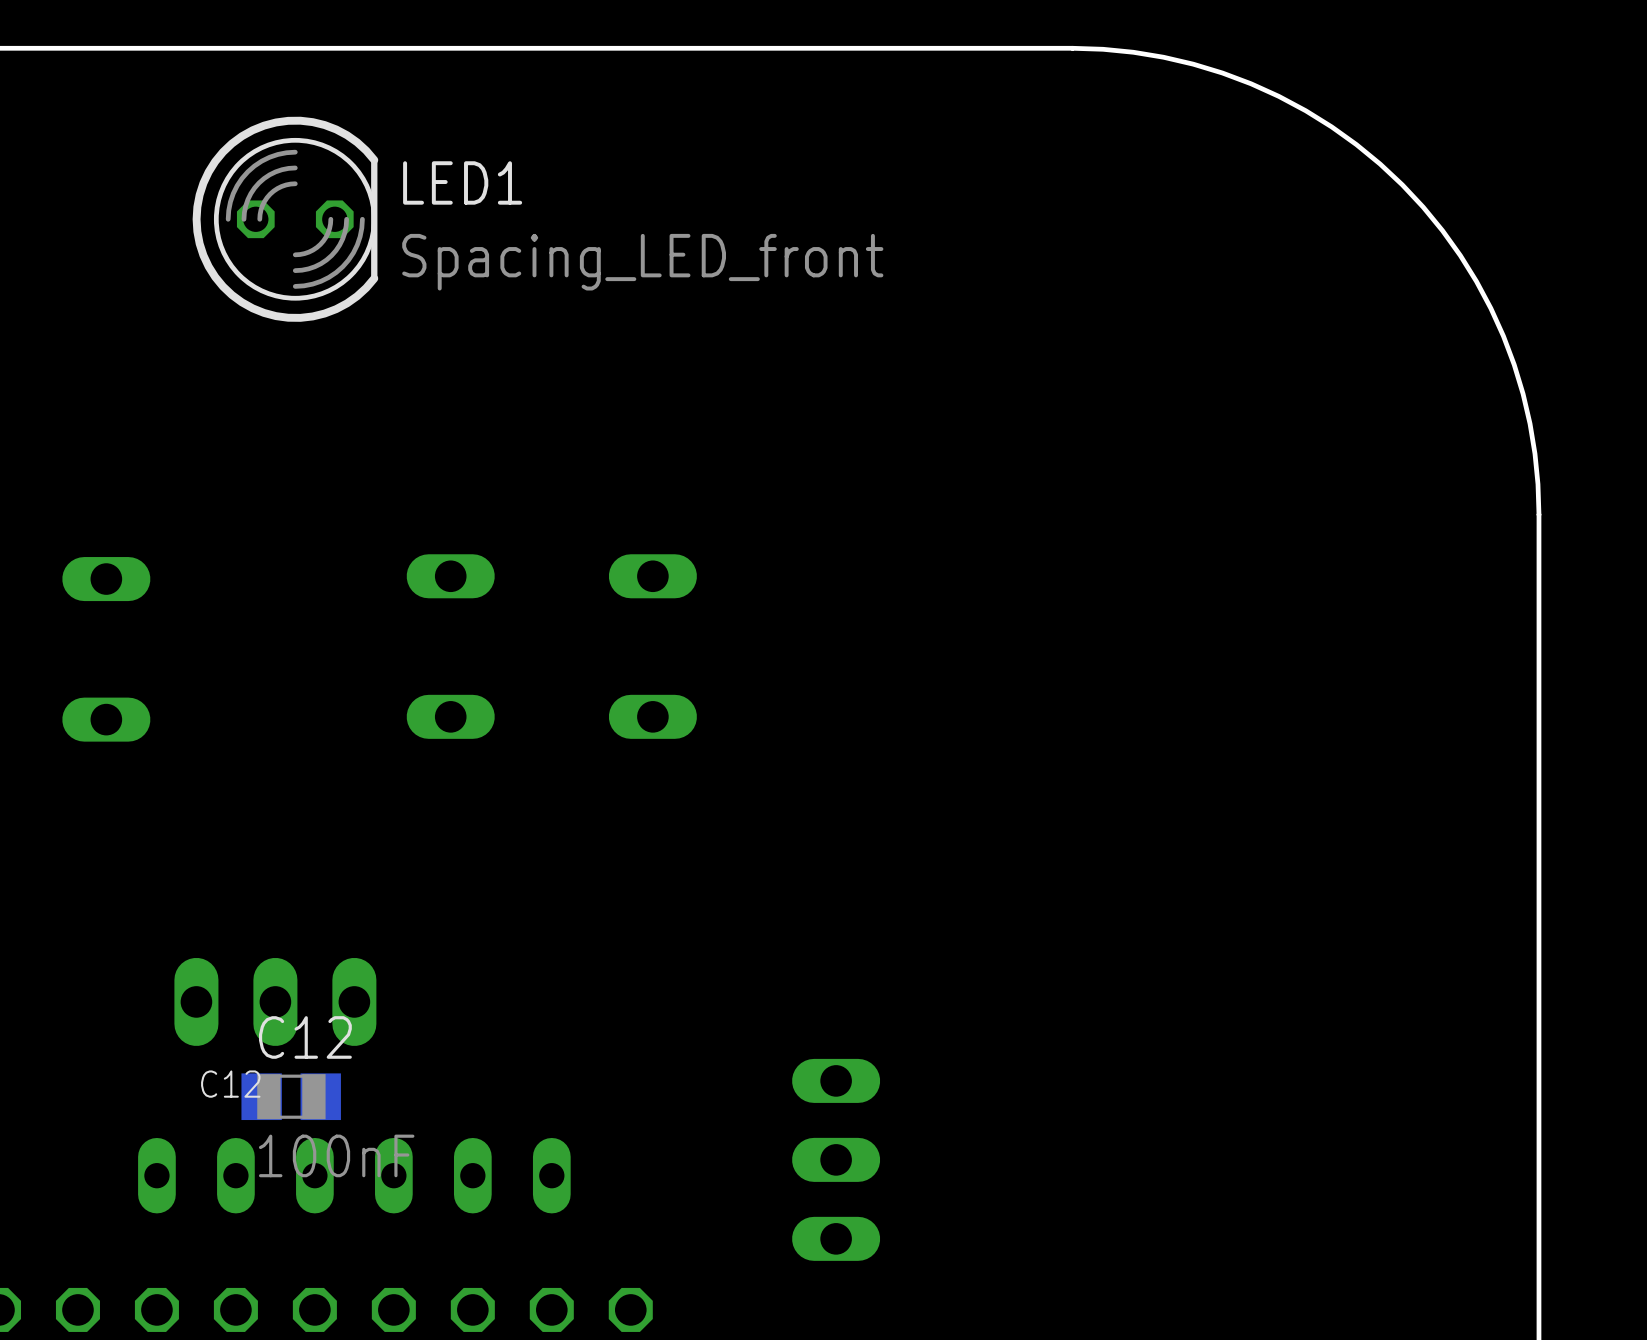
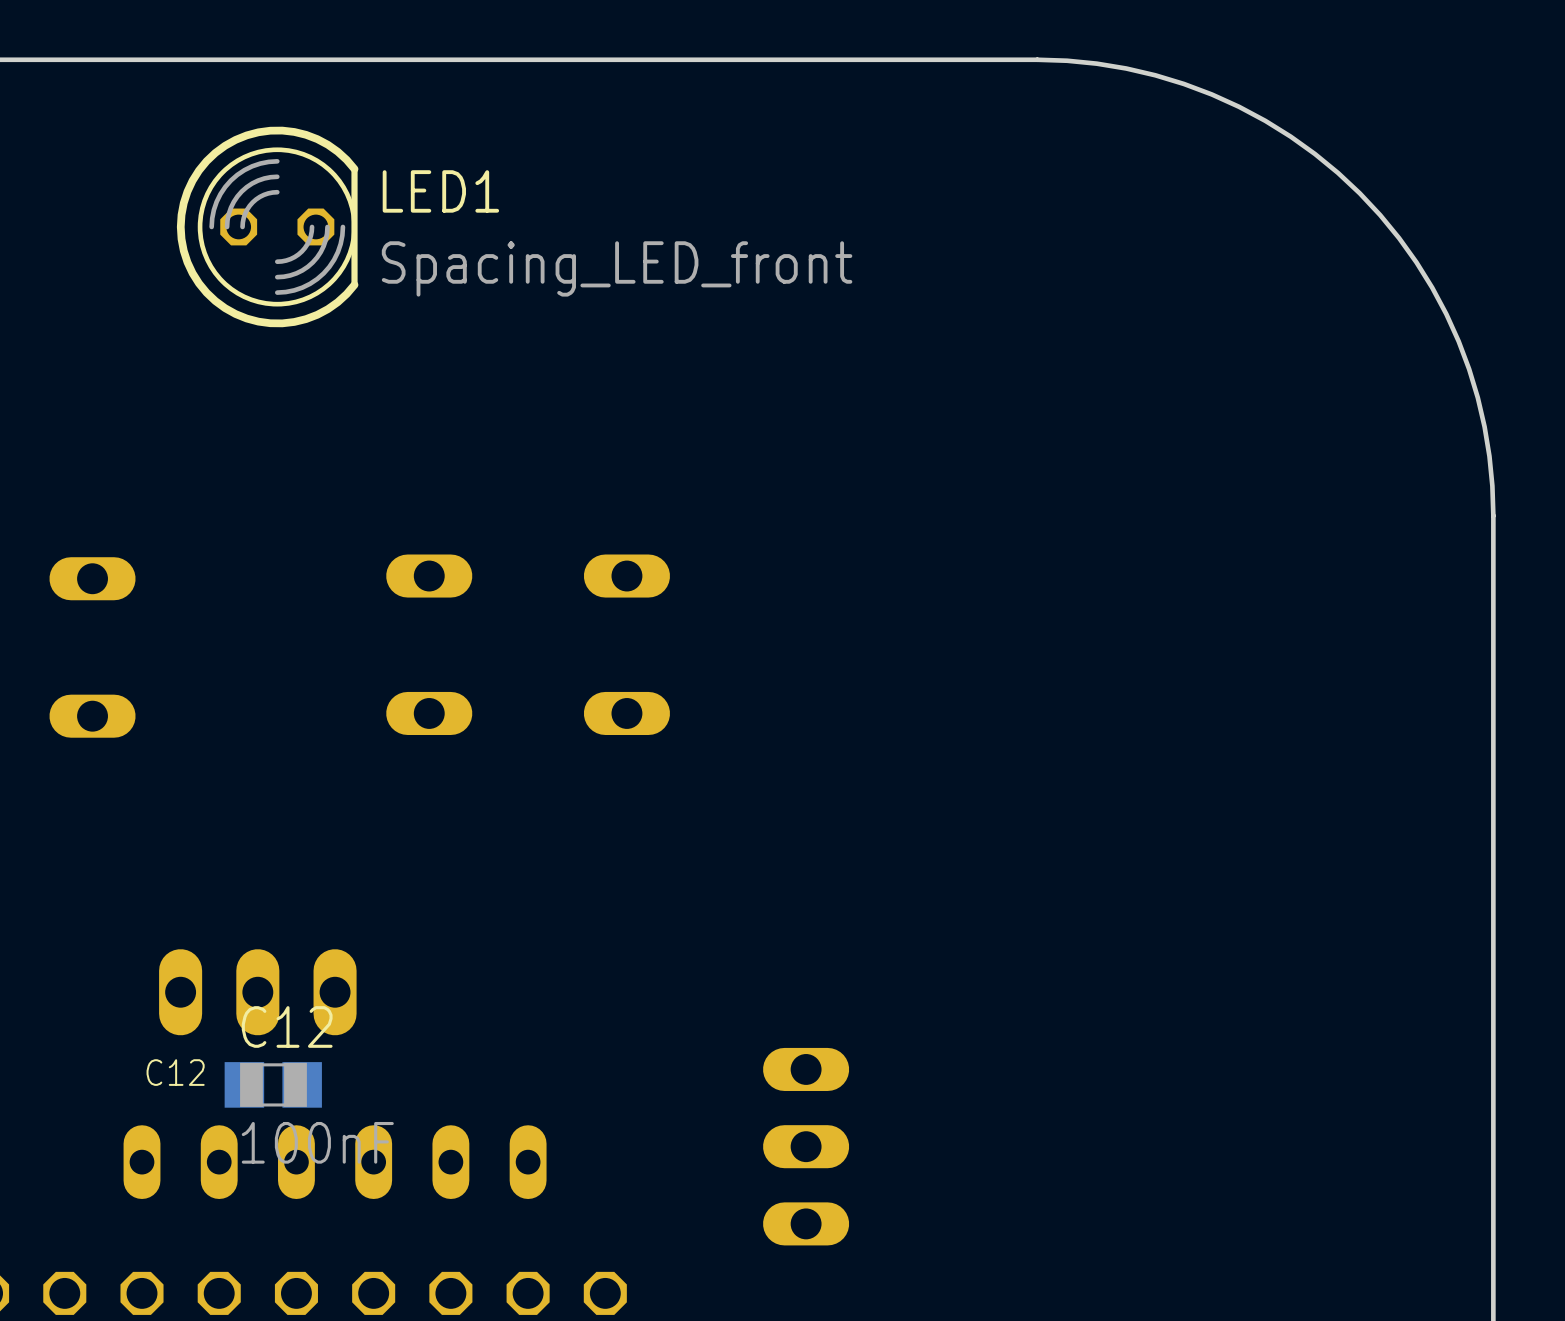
text position: C12 (230, 1084) -> C12 (175, 1072)

